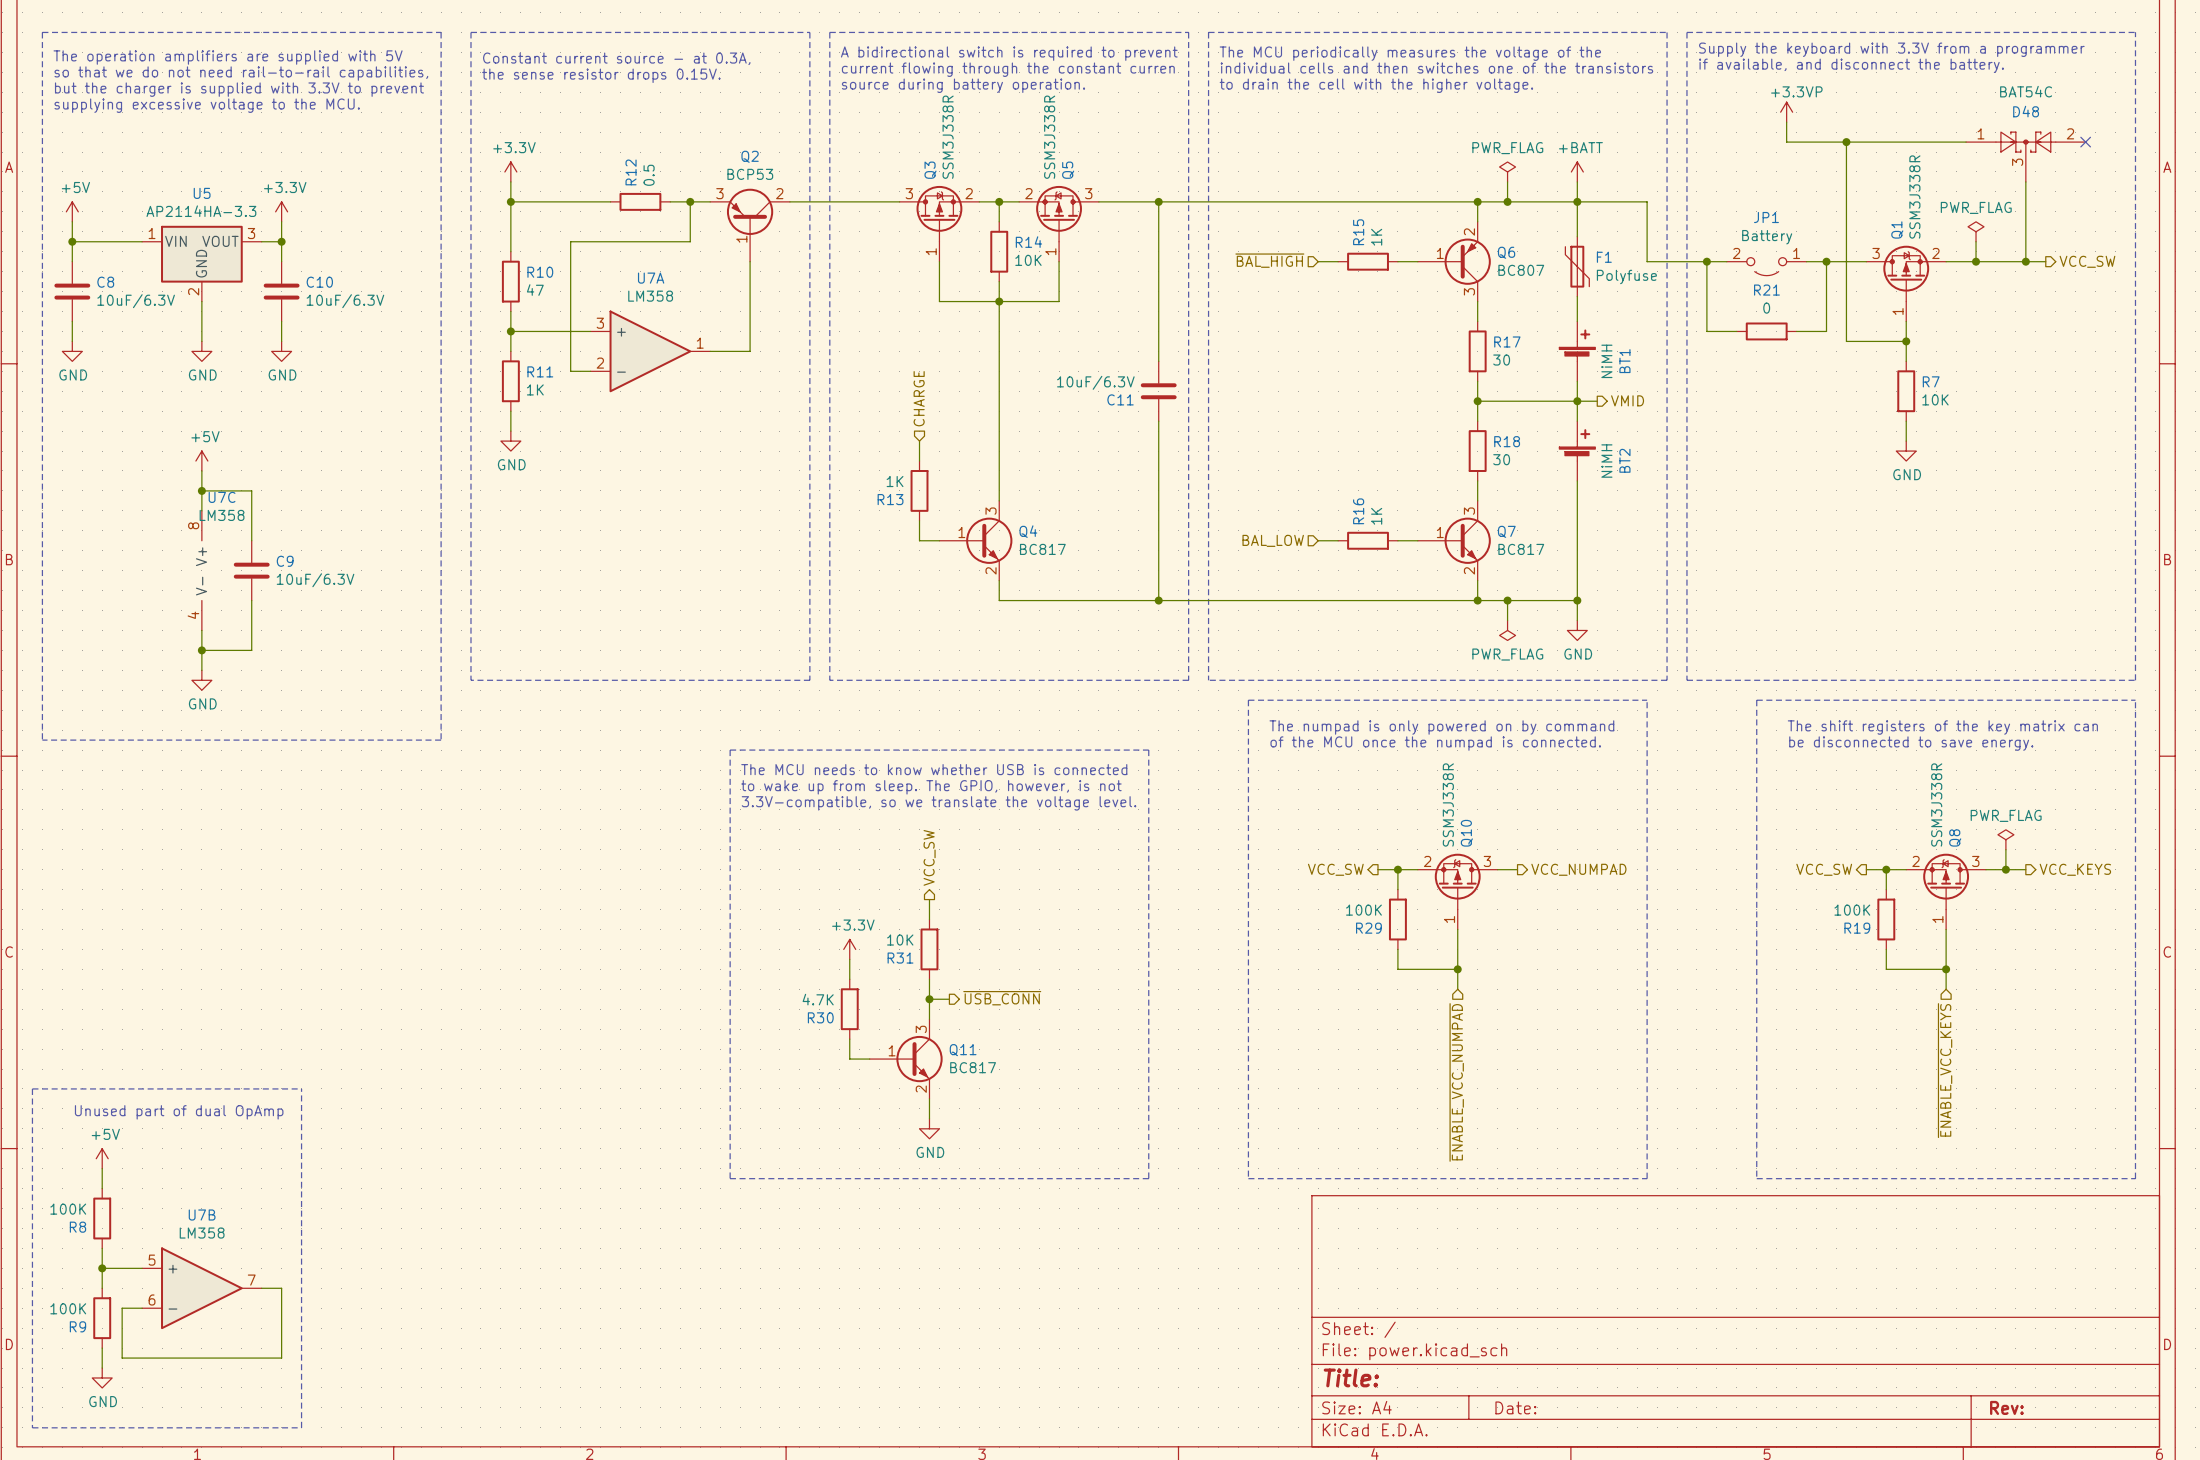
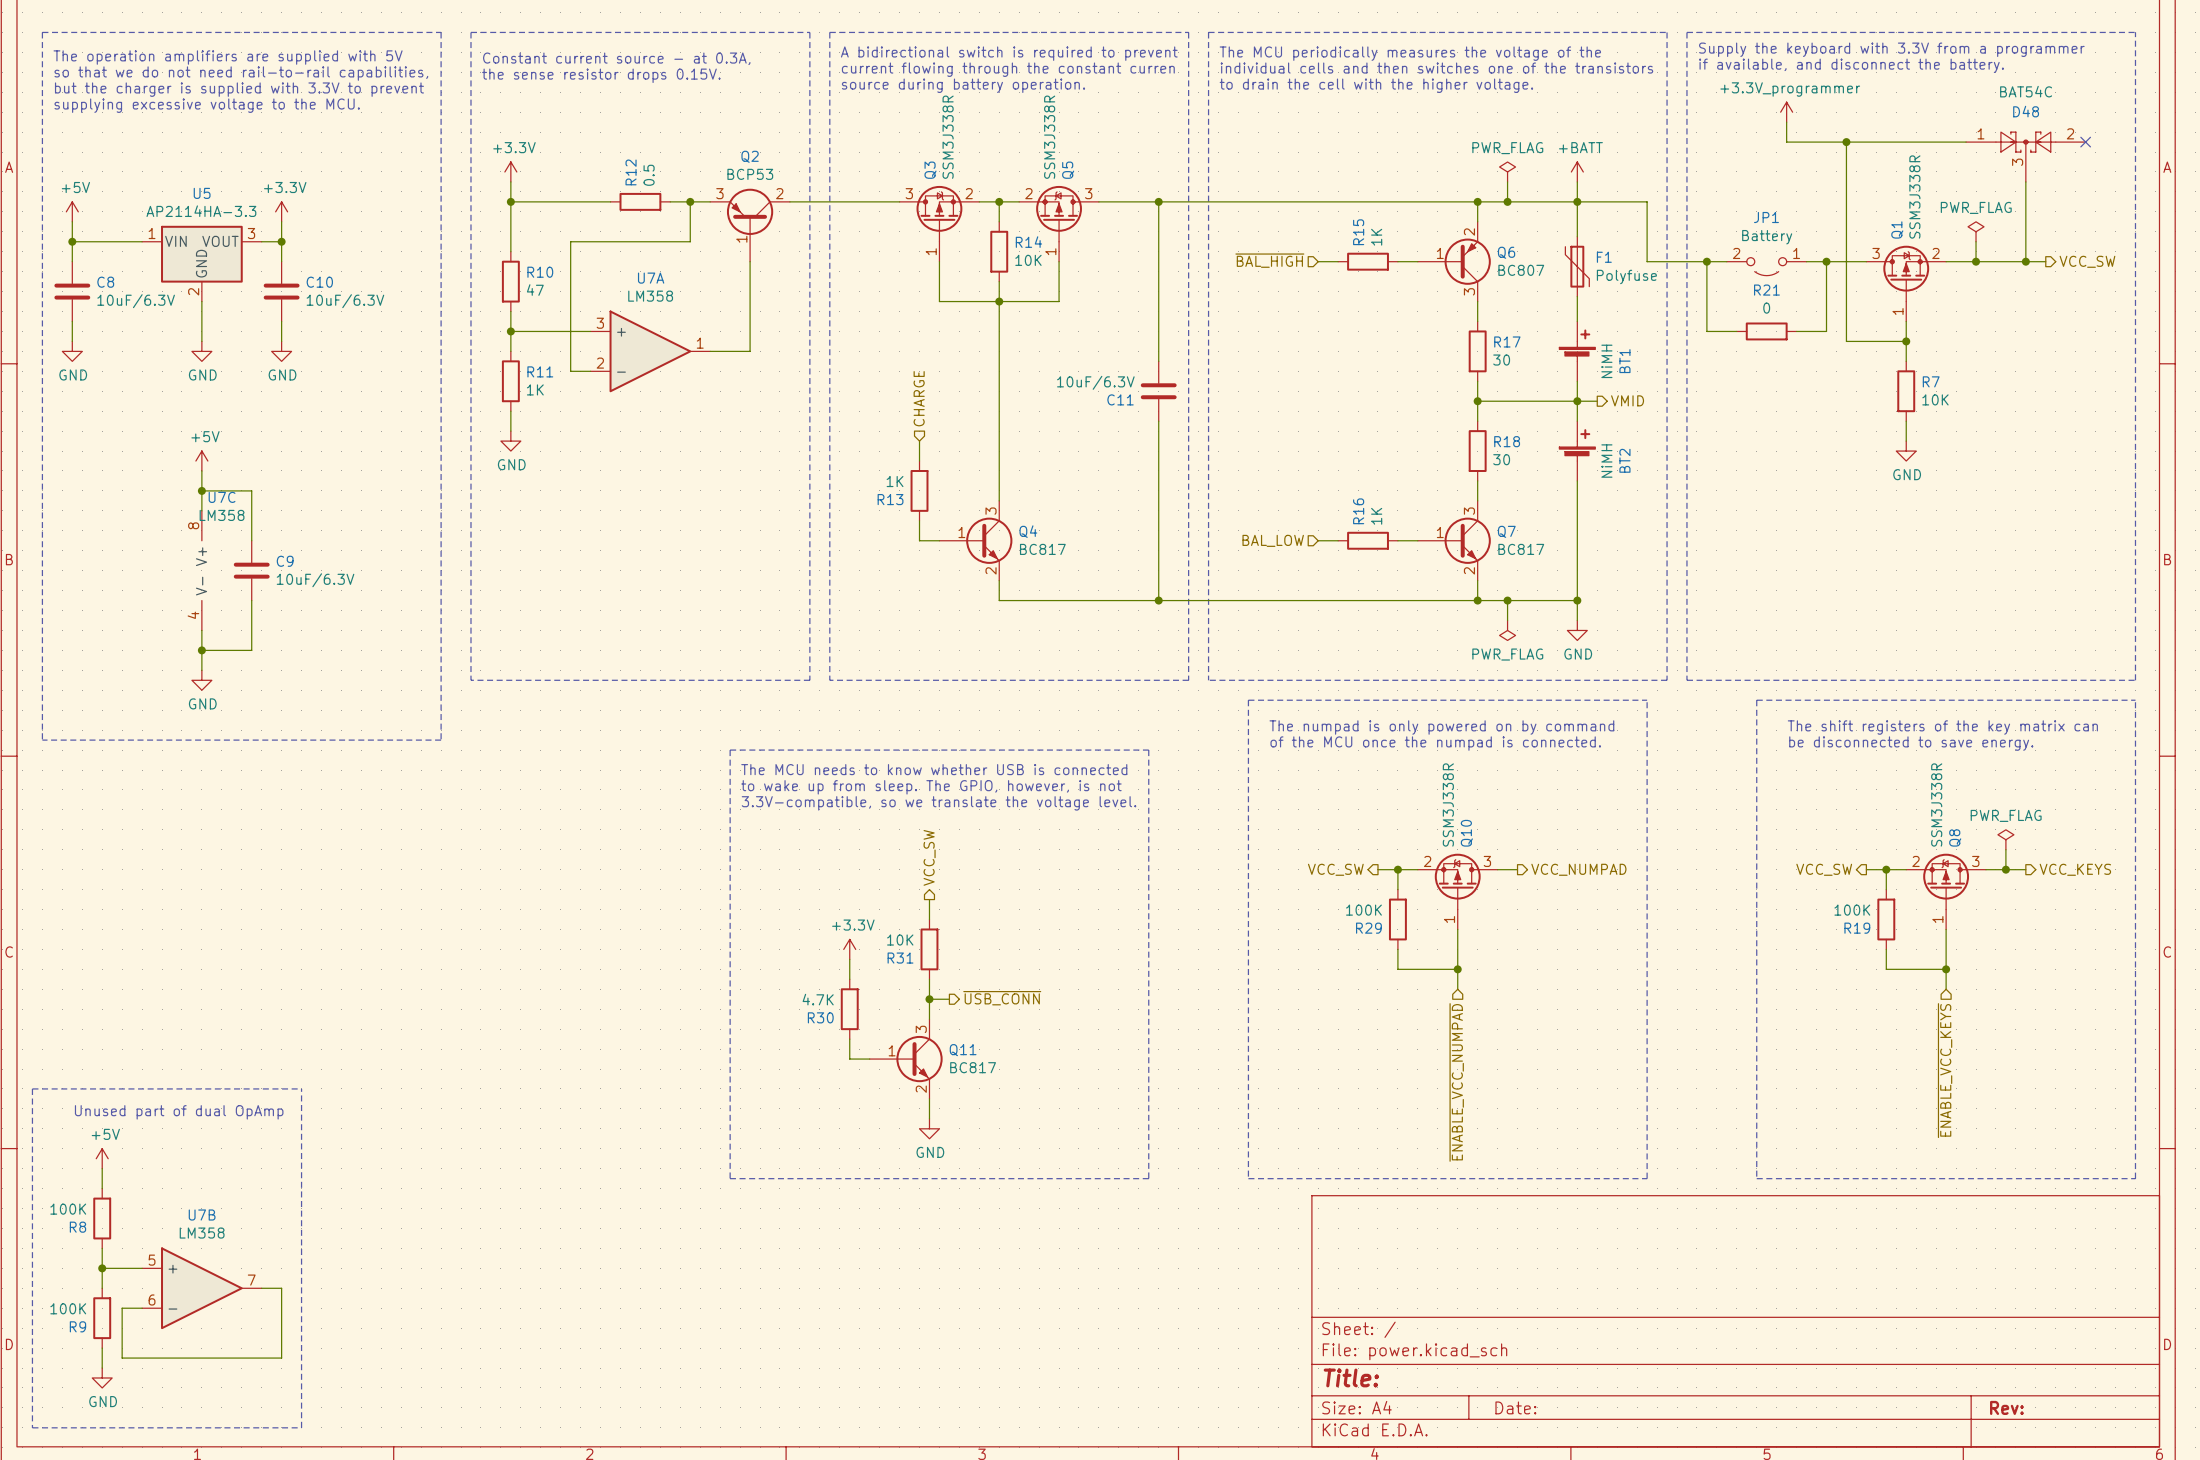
power symbol: +3.3VP (1786, 112) -> +3.3V_programmer (1786, 112)

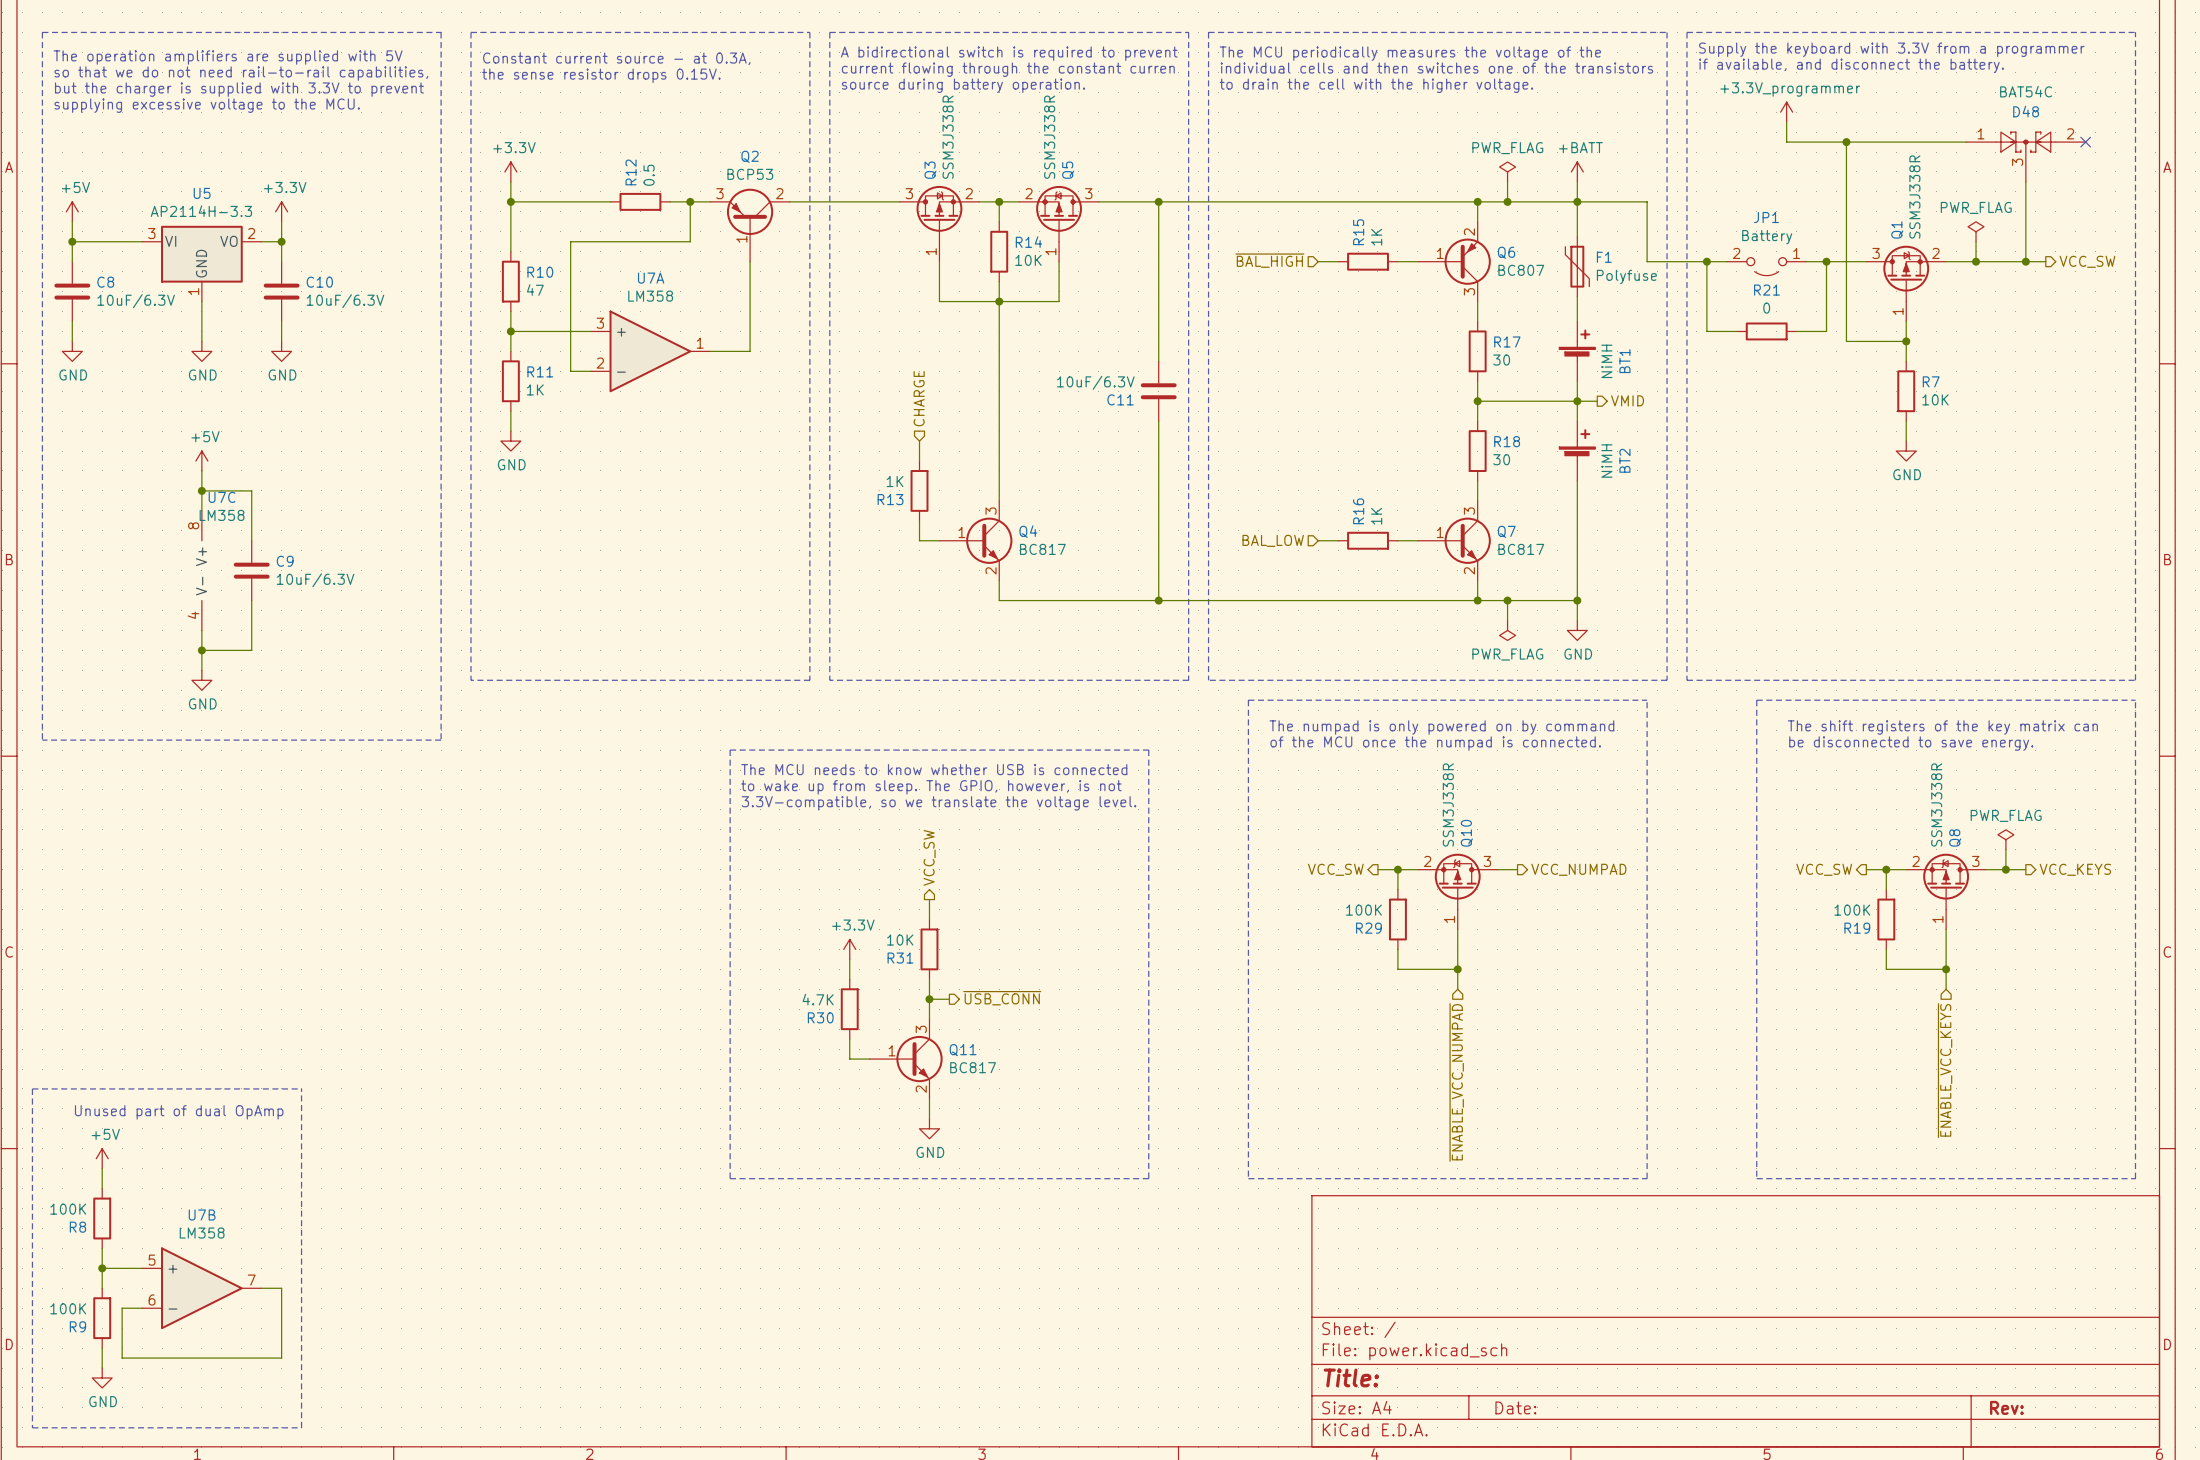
U5 value: AP2114HA-3.3 (201, 211) -> AP2114H-3.3 (201, 211)
U5 pin number: 1 (152, 233) -> 3 (151, 233)
U5 pin number: 3 (251, 233) -> 2 (251, 233)
U5 pin name: VIN (175, 241) -> VI (170, 241)
U5 pin name: VOUT (220, 241) -> VO (229, 241)
U5 pin number: 2 (193, 291) -> 1 (193, 291)

